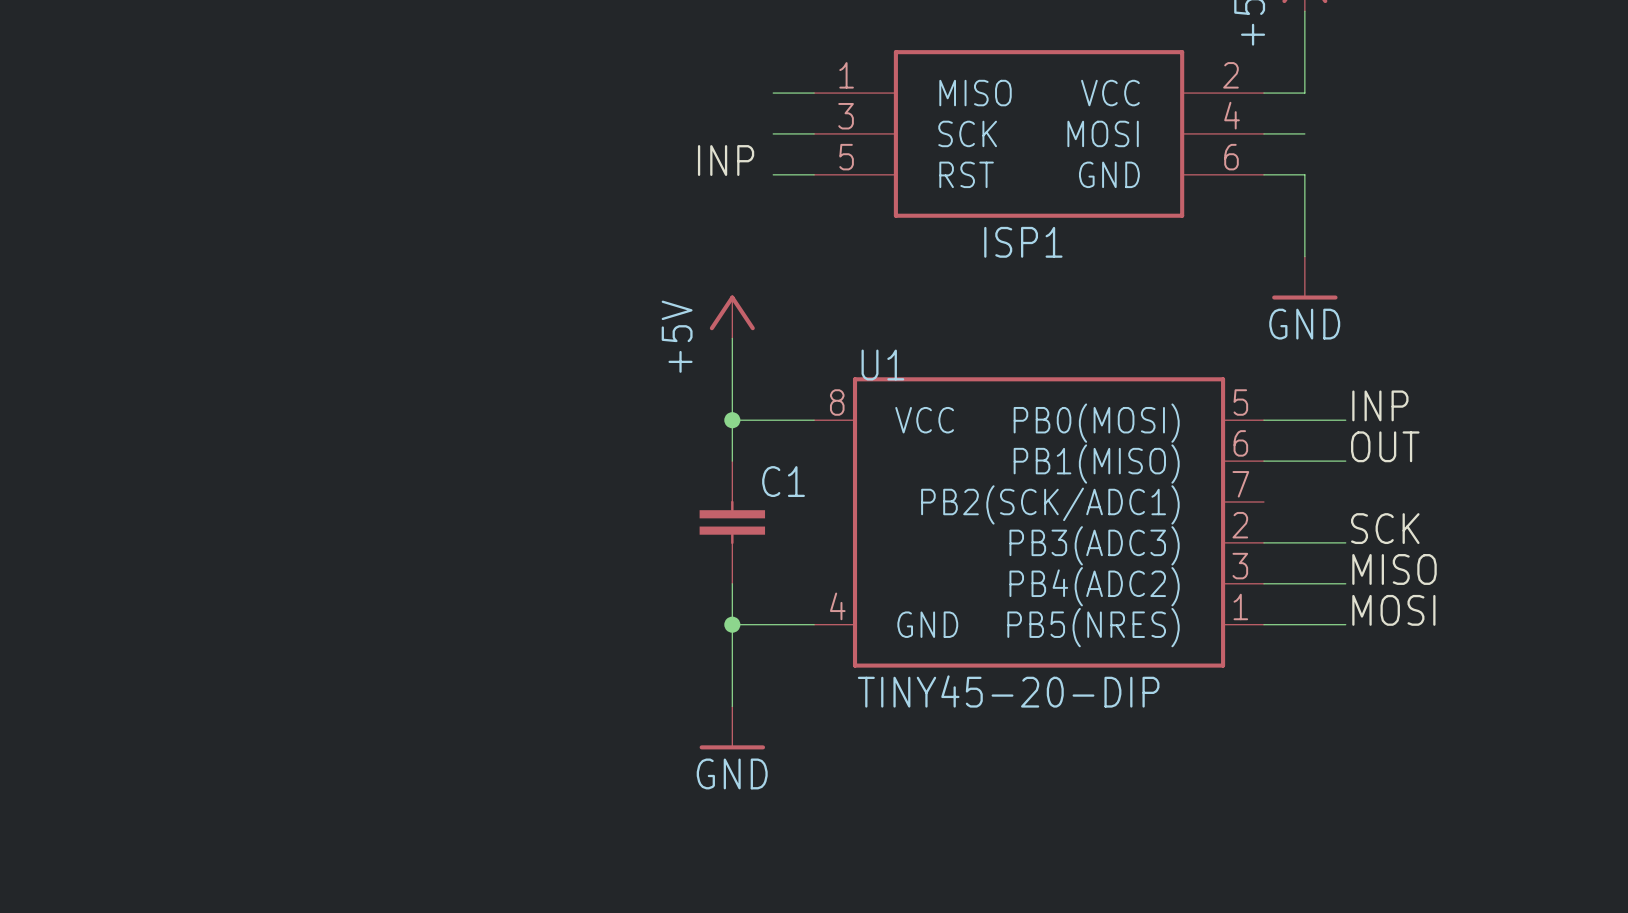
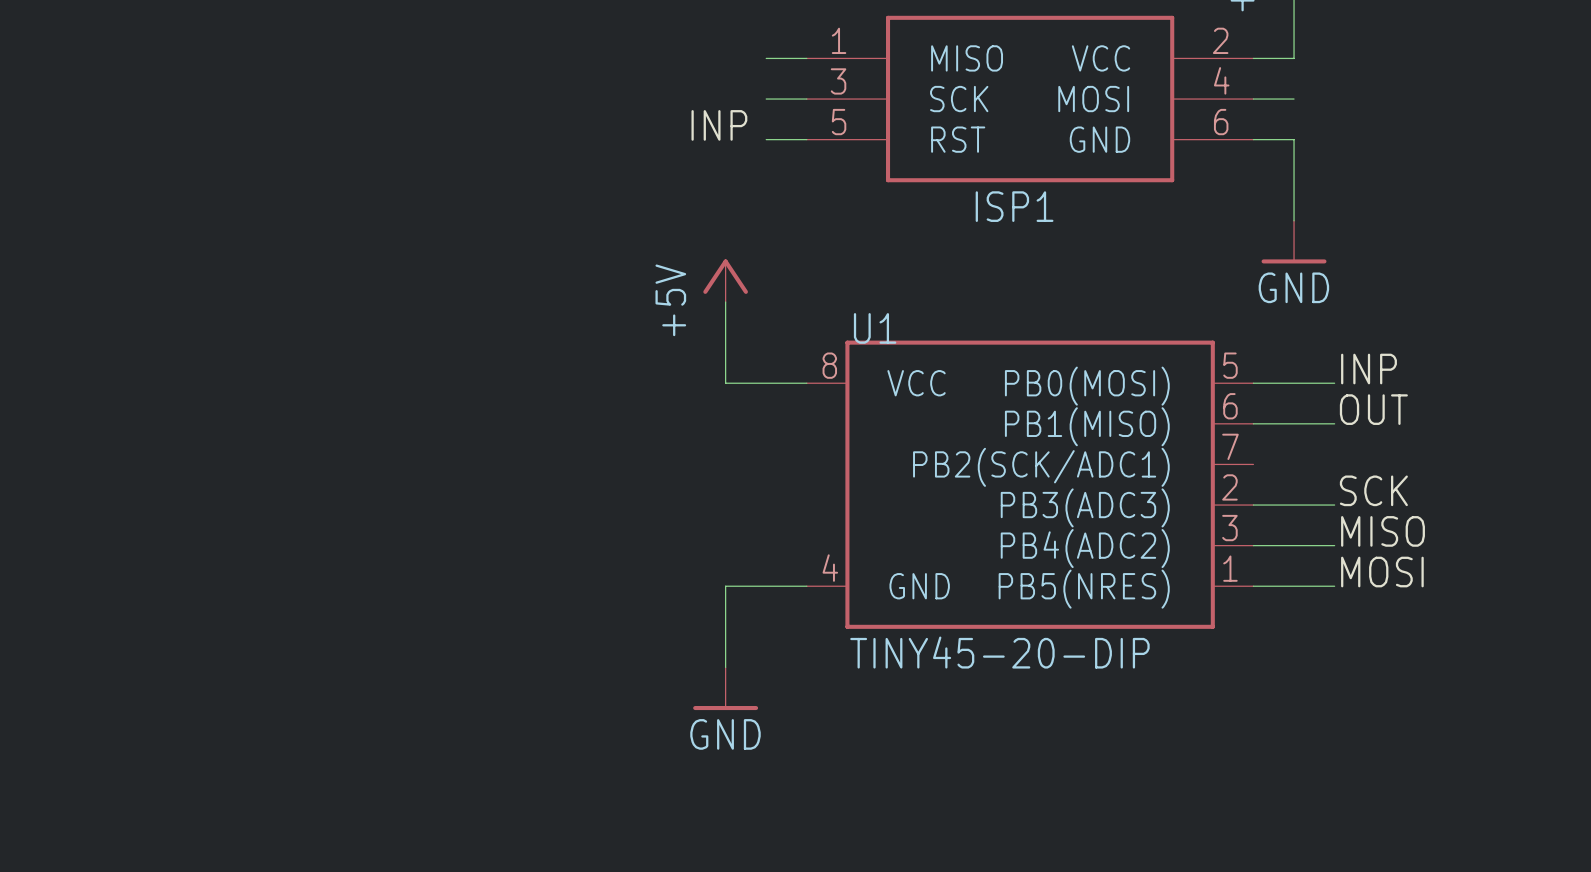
wire: (732, 420) (732, 461) -> none
junction: (732, 420) -> none
C1: (732, 522) -> none
wire: (732, 583) (732, 624) -> none
junction: (732, 624) -> none

